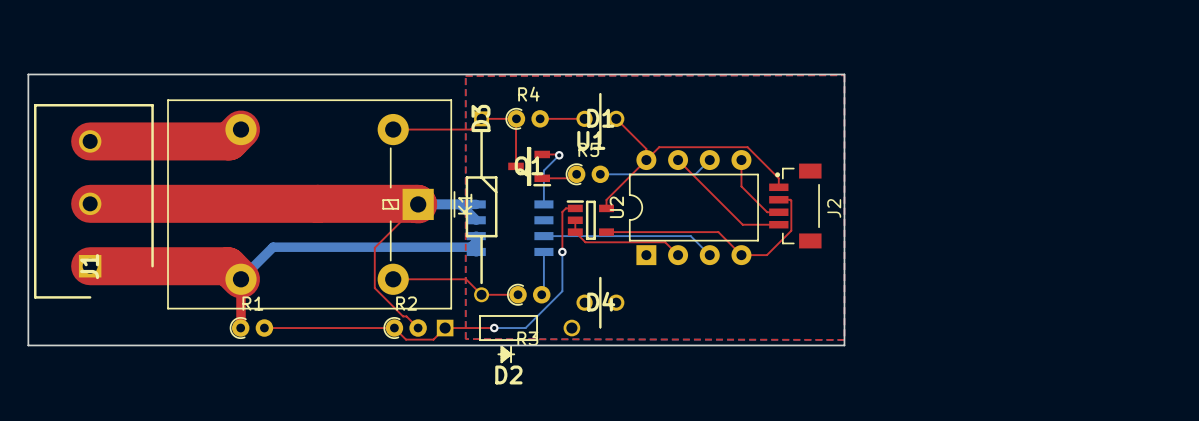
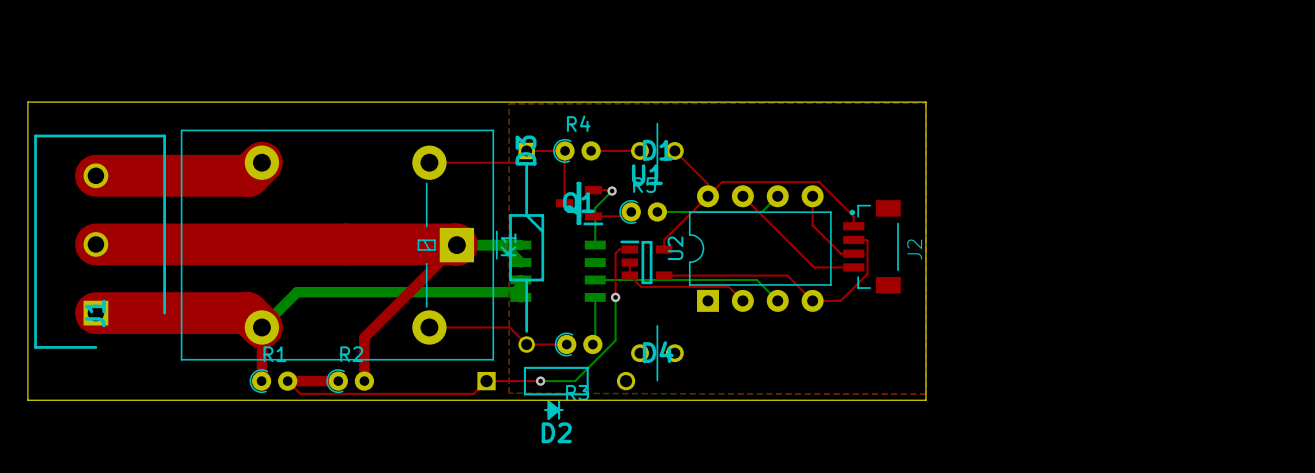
top track width: thin (418, 204) (374, 247) -> thick (456, 245) (409, 292)
top track: (374, 247) (374, 288) (403, 316) (406, 316) (418, 328) -> (409, 292) (364, 337) (364, 381)
top track width: thin (264, 328) (310, 328) -> thick (287, 381) (338, 381)
top track: (310, 328) (394, 328) (406, 339) -> (287, 381) (300, 393) (443, 393)
R2 position: (405, 328) -> (350, 381)

